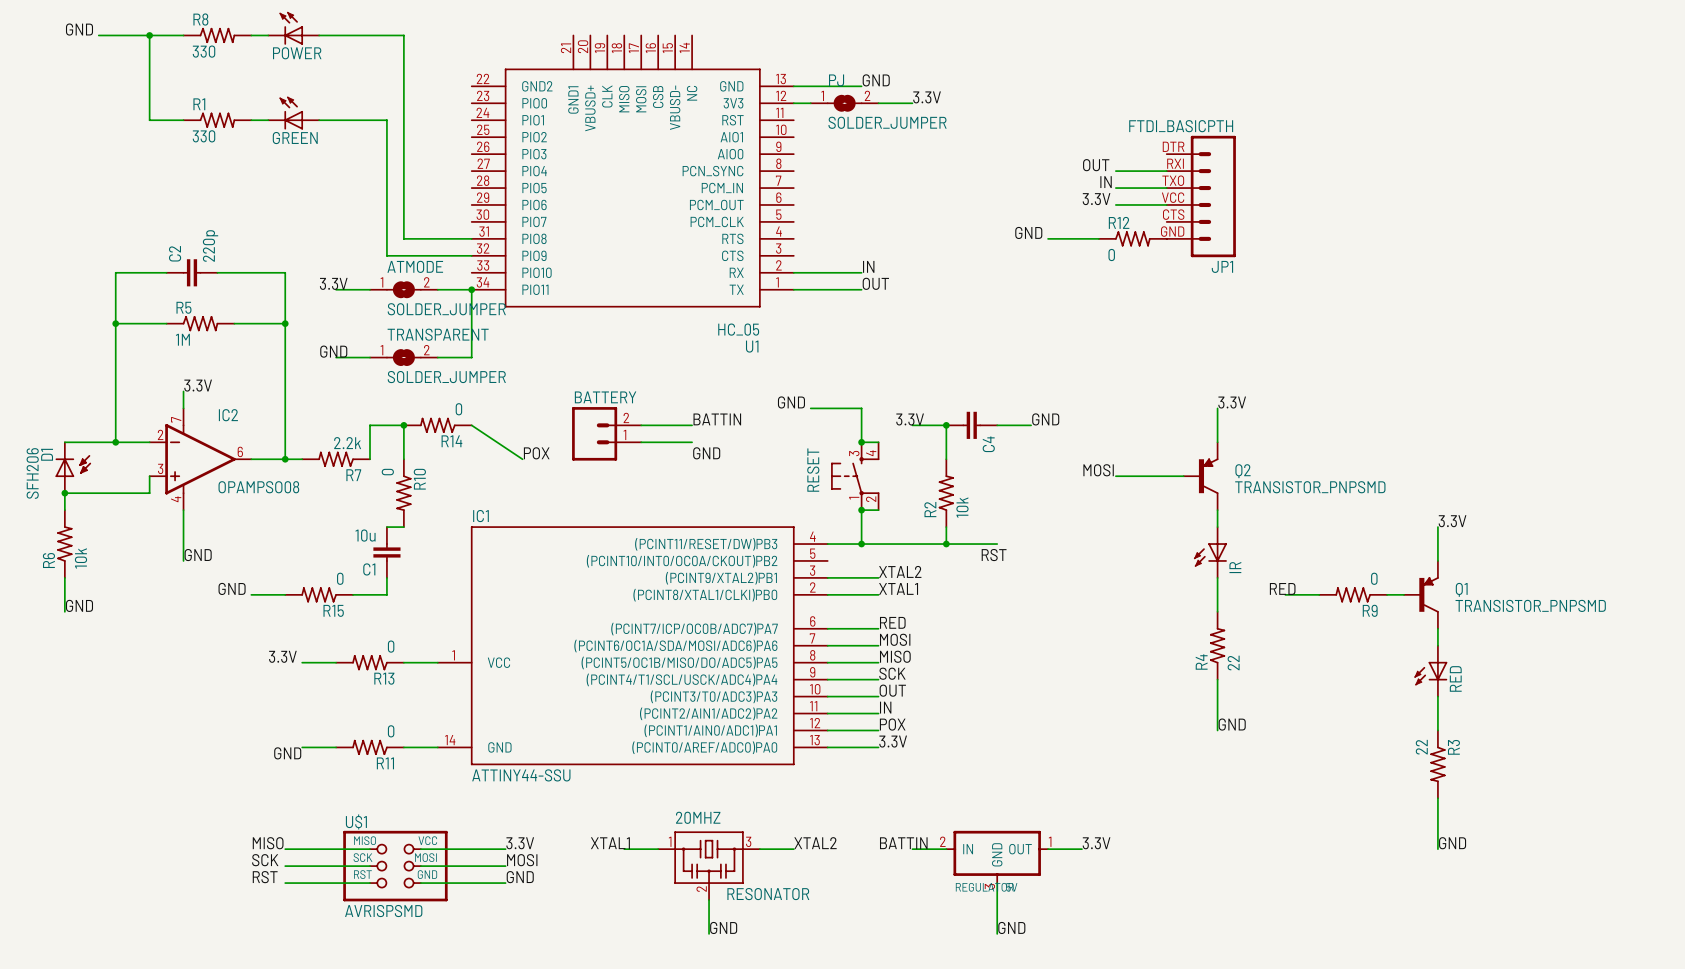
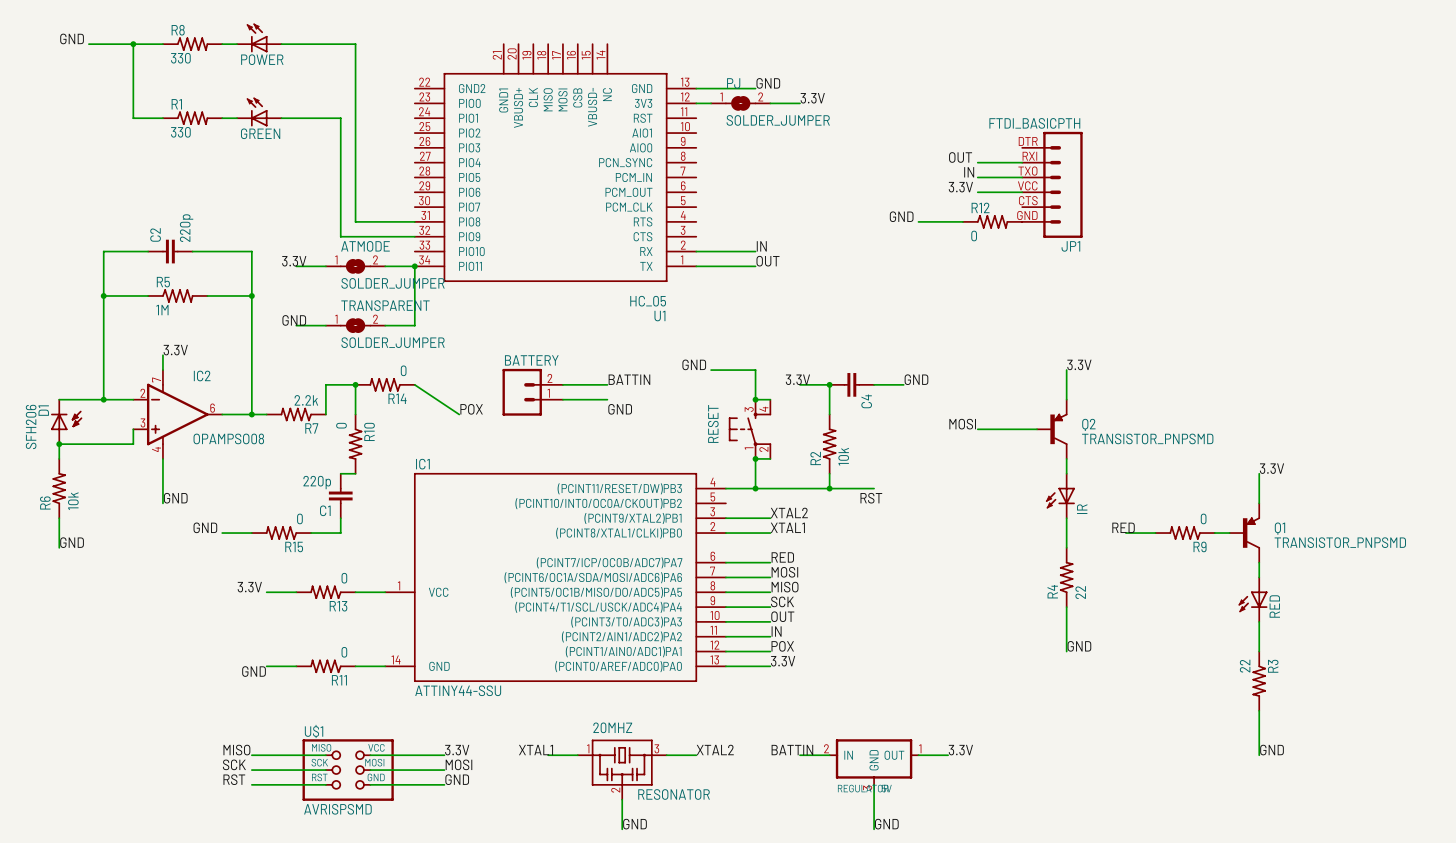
C1 value: 10u (365, 535) -> 220p (317, 482)

